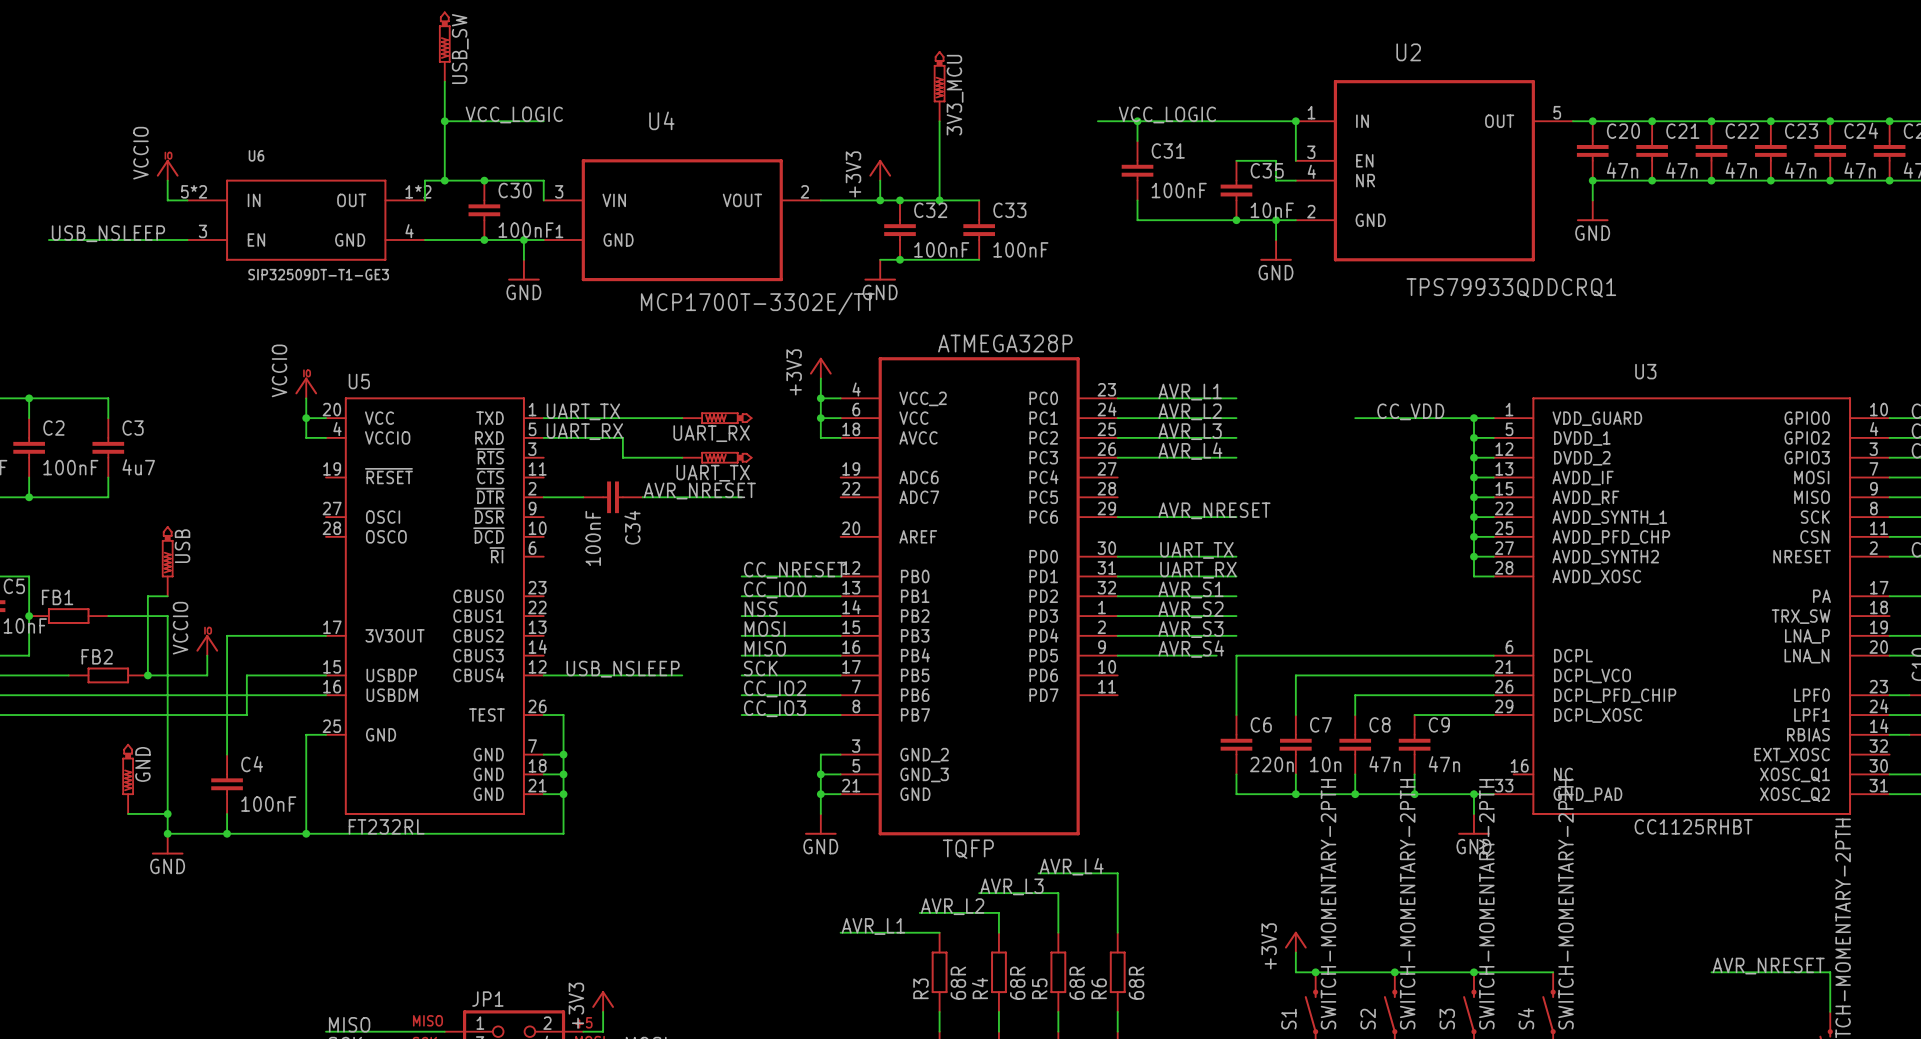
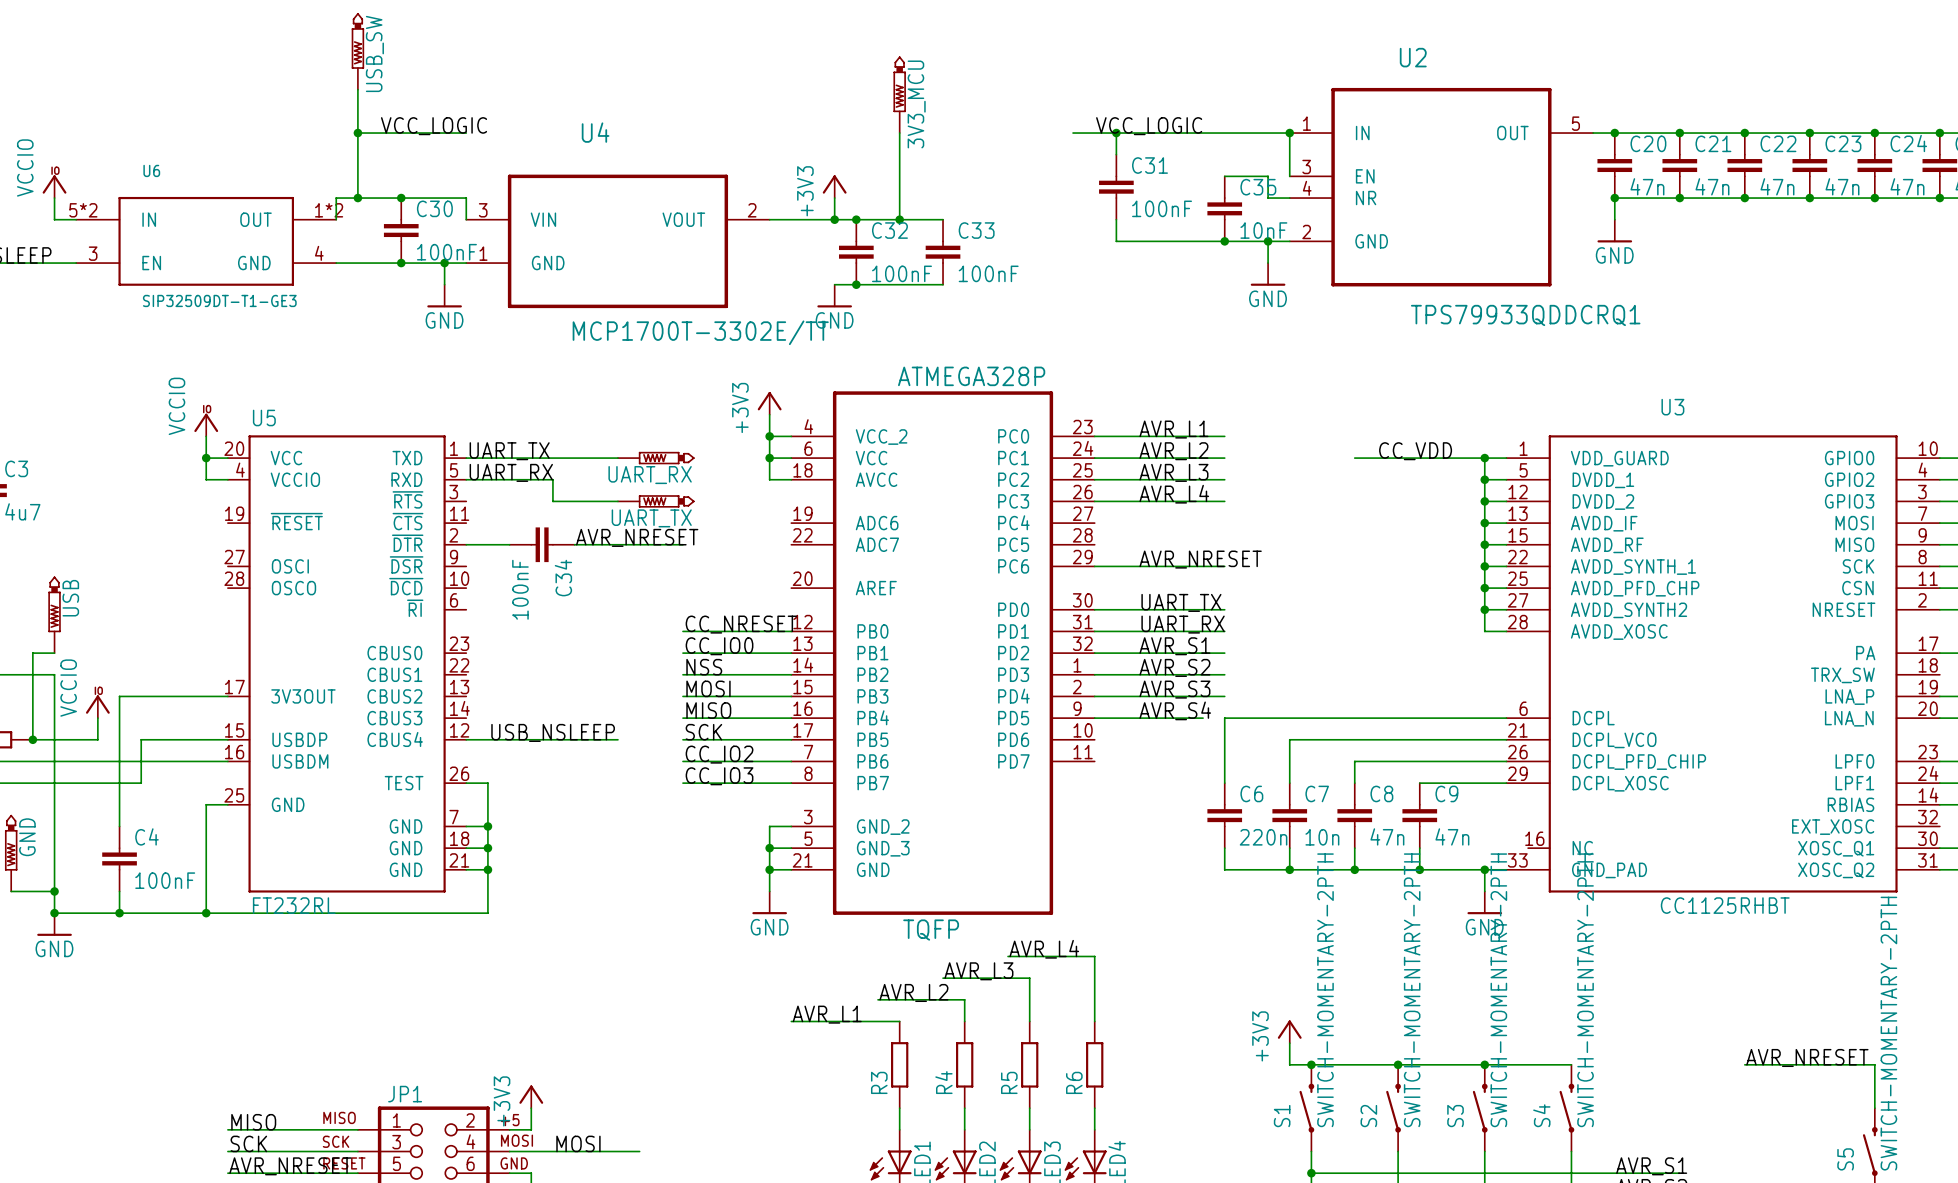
R3 value: 68R (958, 983) -> none
R4 value: 68R (1017, 983) -> none
R5 value: 68R (1077, 983) -> none
R6 value: 68R (1136, 983) -> none

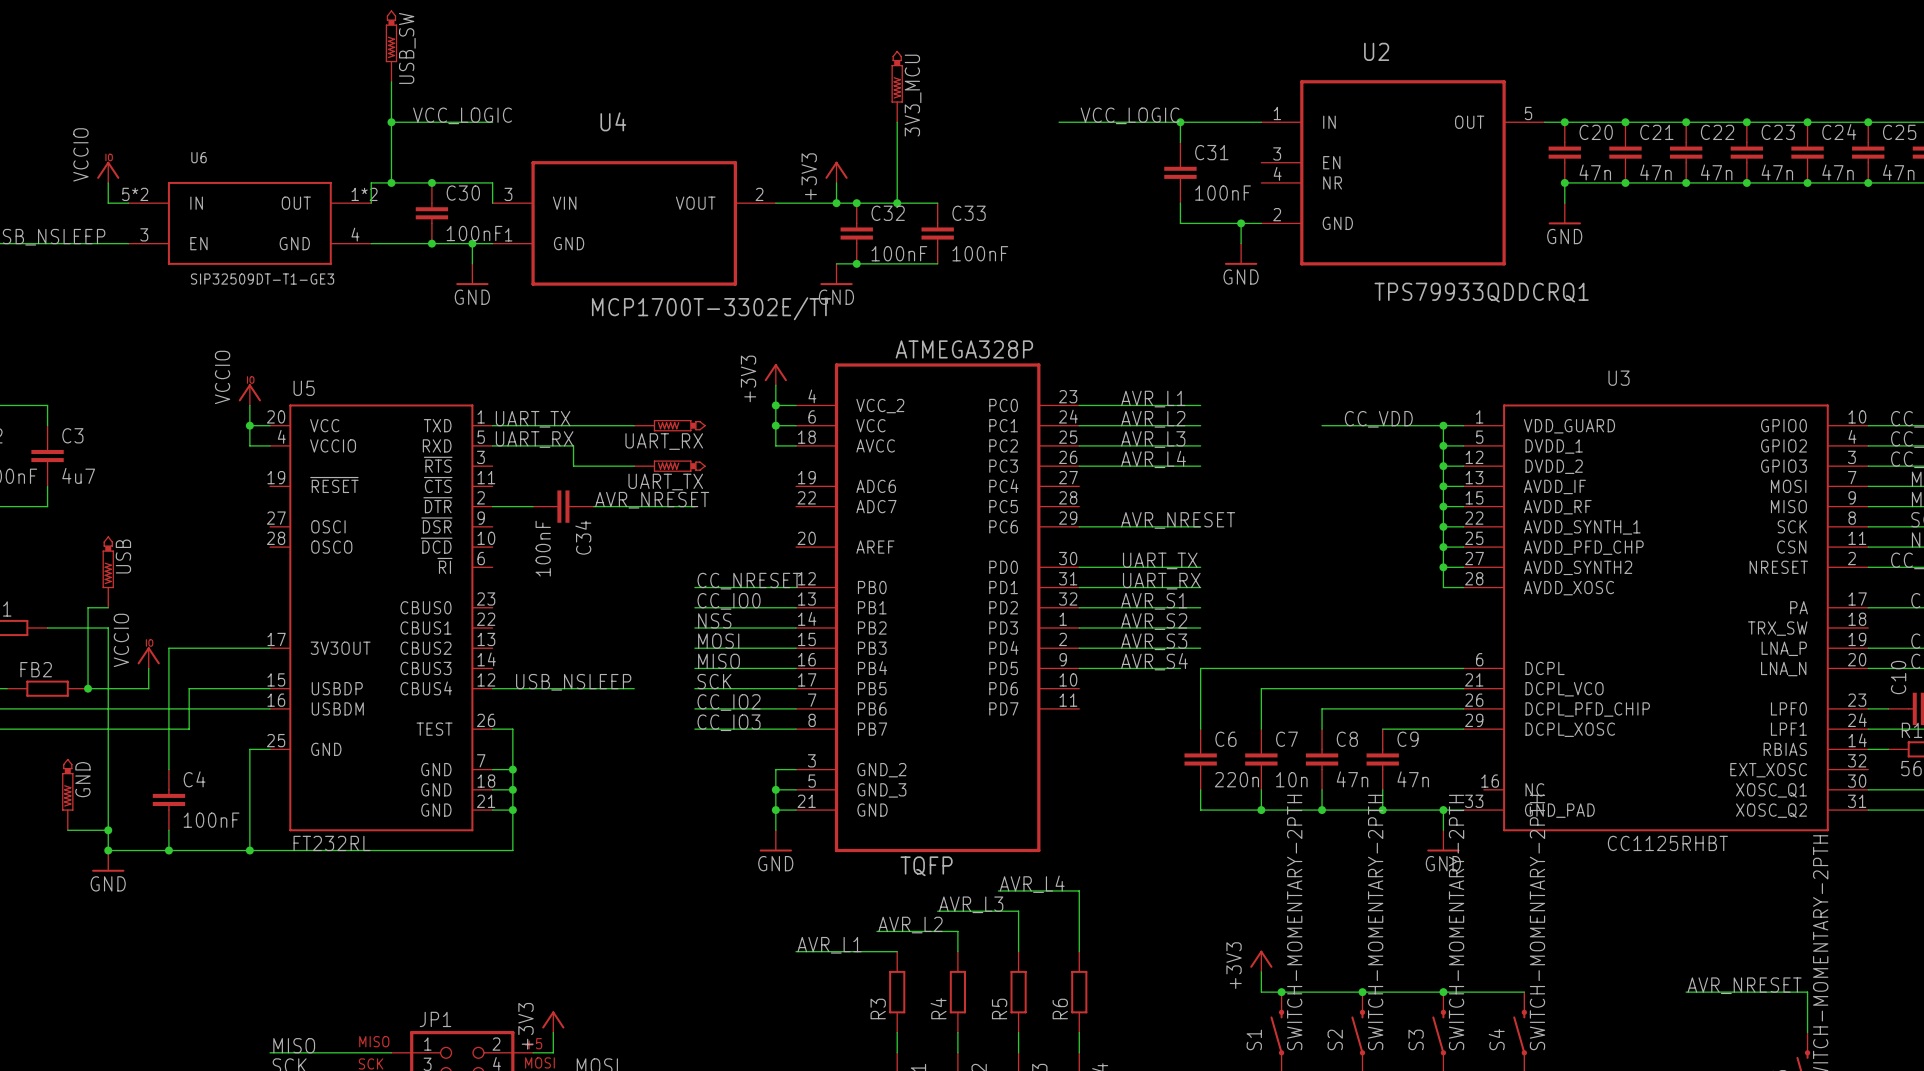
wire: (1116, 133) (1116, 154) -> (1180, 122) (1180, 142)
junction: (1116, 133) -> none
junction: none -> (1180, 122)
wire: (1289, 133) (1289, 176) -> none
junction: (1289, 133) -> none
wire: (1224, 176) (1268, 176) (1268, 198) (1289, 198) -> none
C31 position: (1116, 187) -> (1180, 172)
C35: 10nF (1224, 208) -> none
wire: (1116, 219) (1116, 241) (1203, 241) -> (1180, 203) (1180, 223)
junction: (1224, 241) -> none

